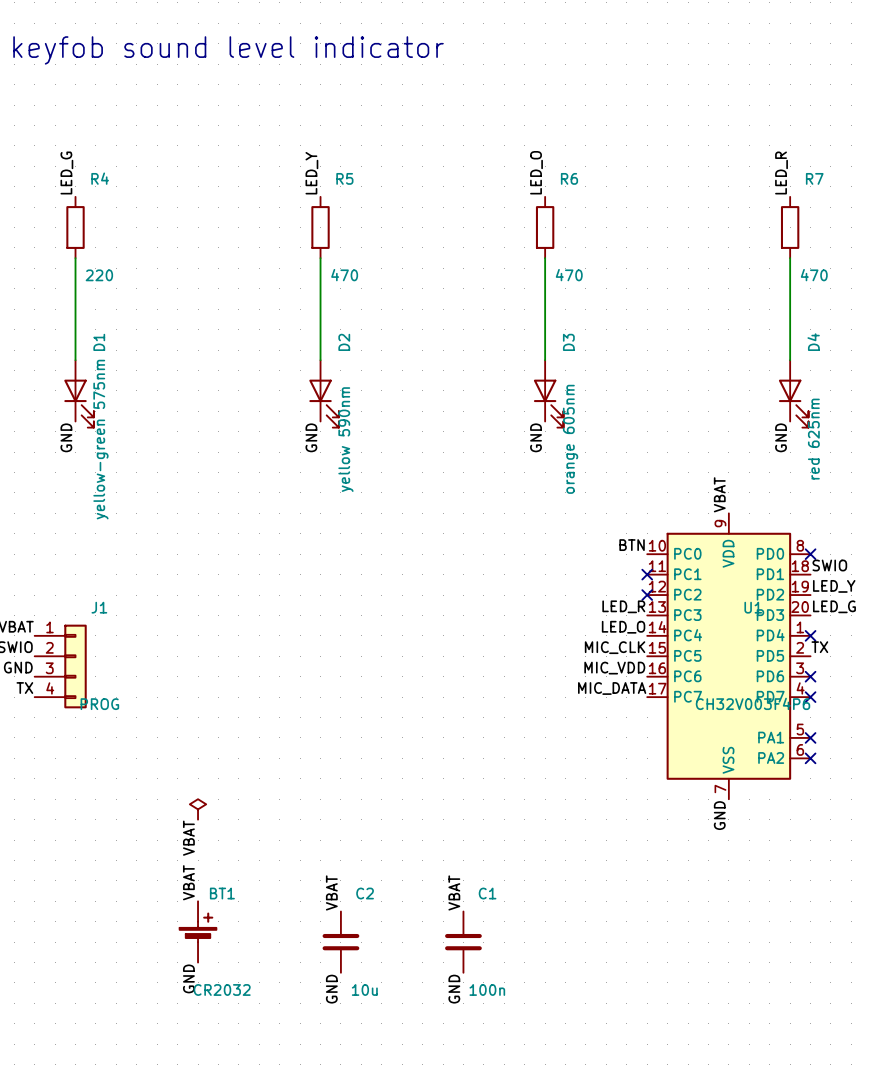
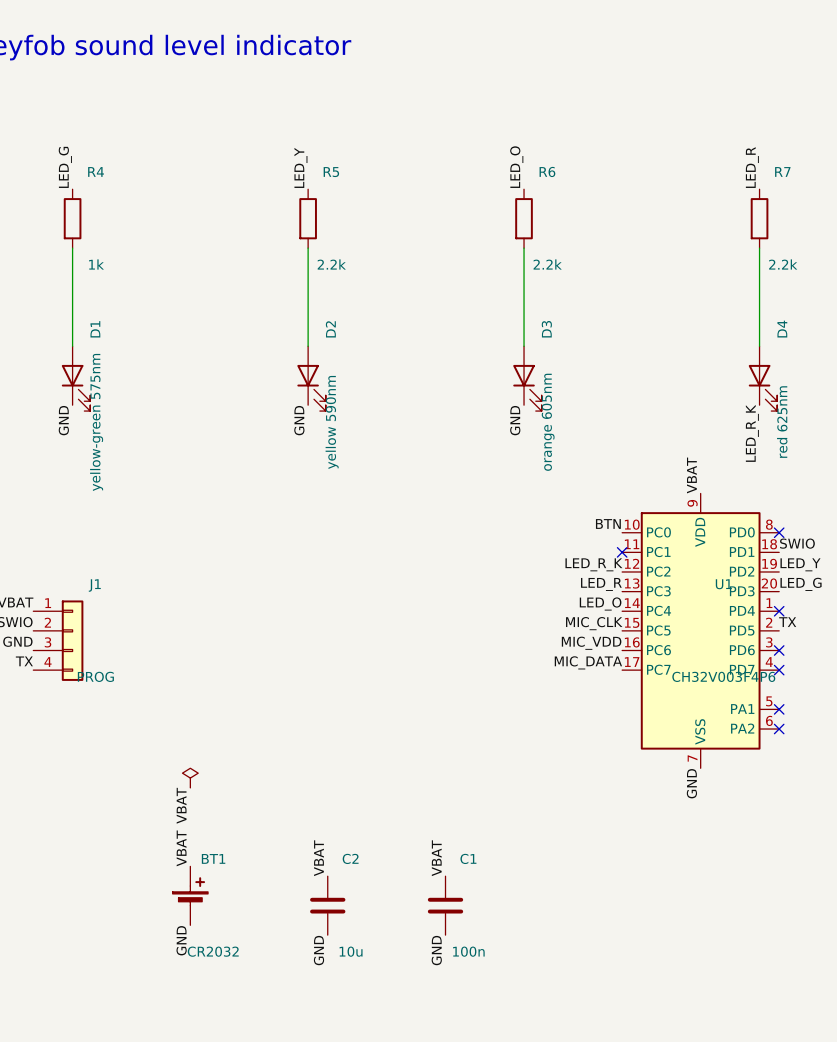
R4 value: 220 (99, 275) -> 1k (96, 264)
R5 value: 470 (344, 275) -> 2.2k (331, 264)
R6 value: 470 (569, 275) -> 2.2k (547, 264)
R7 value: 470 (814, 275) -> 2.2k (783, 264)
label: GND (781, 437) -> LED_R_K (752, 433)
label: none -> LED_R_K (593, 564)
no-connect mark: (647, 595) -> none

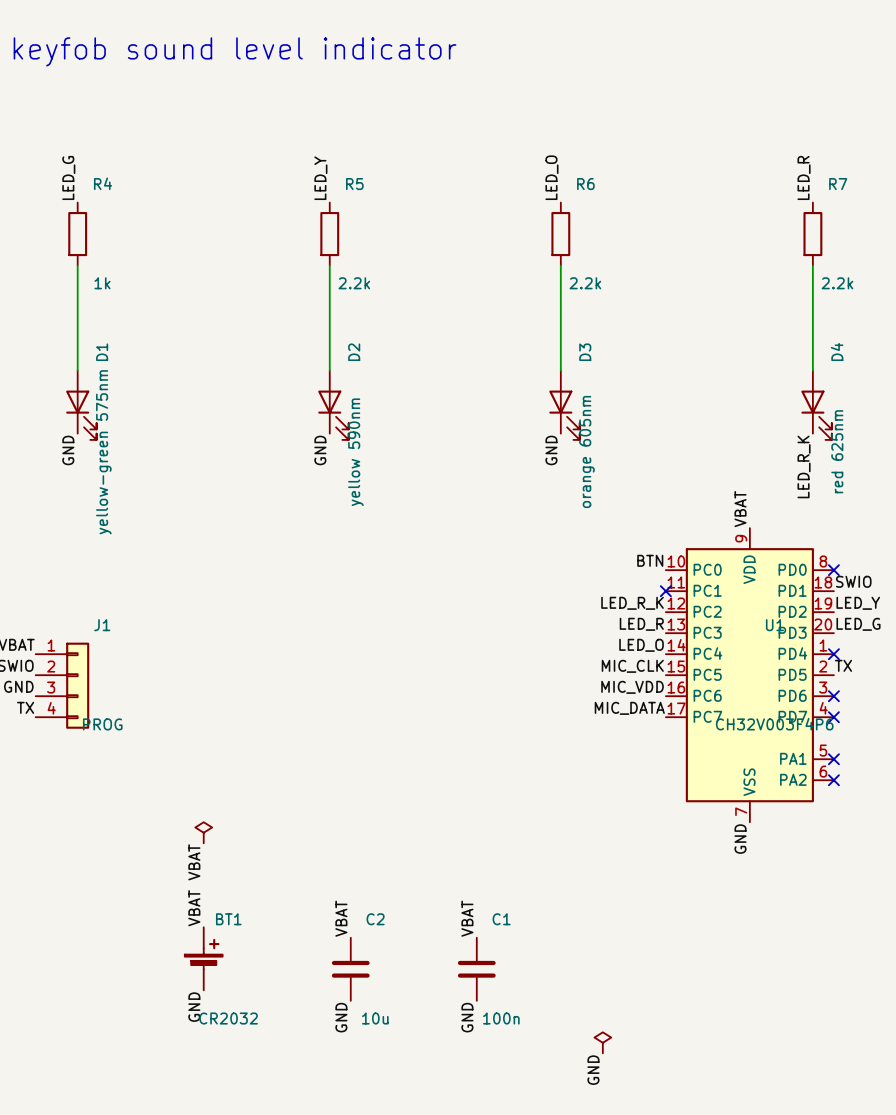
power symbol: none -> (602, 1042)
label: none -> GND (593, 1070)

